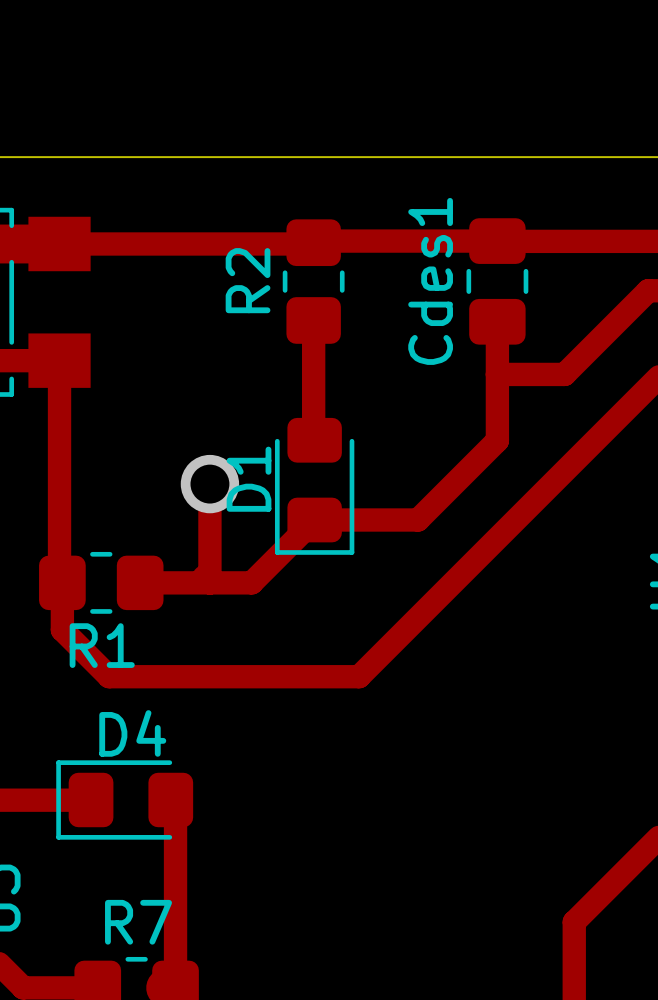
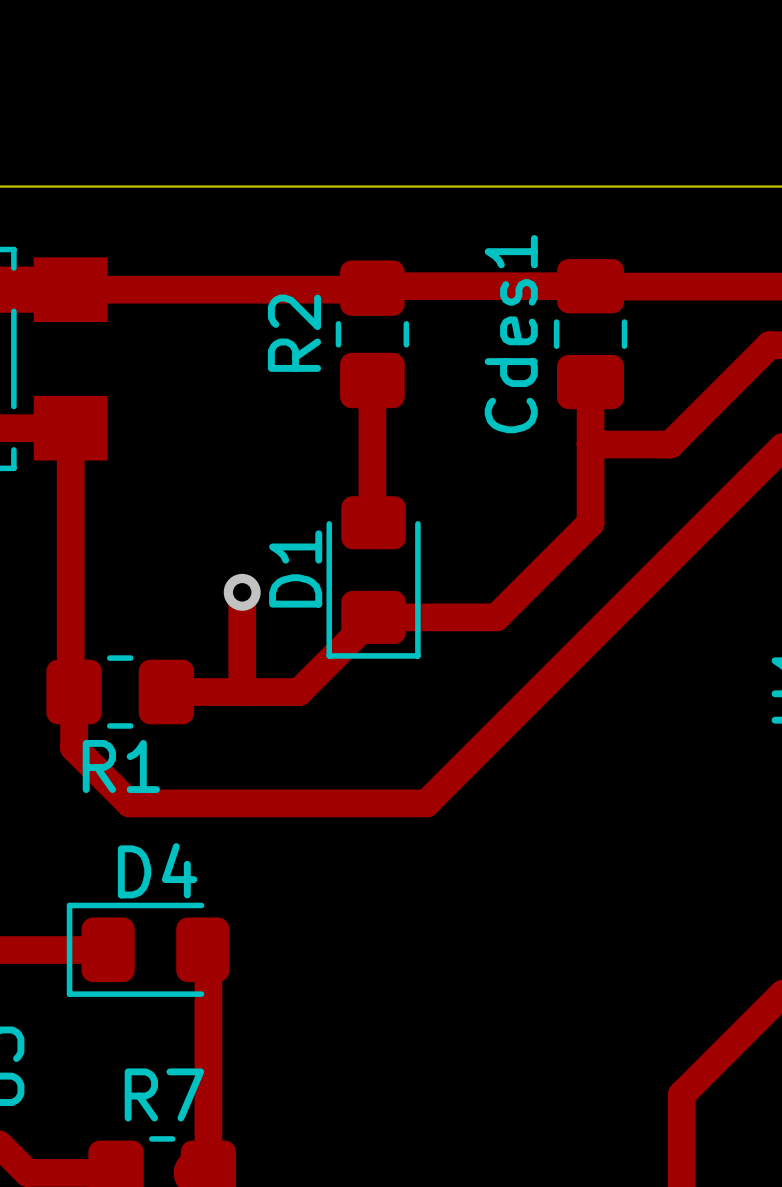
via size: [180, 454, 240, 514] -> [223, 573, 261, 611]
track: (209, 484) (209, 582) -> none
track: none -> (242, 592) (242, 684)

